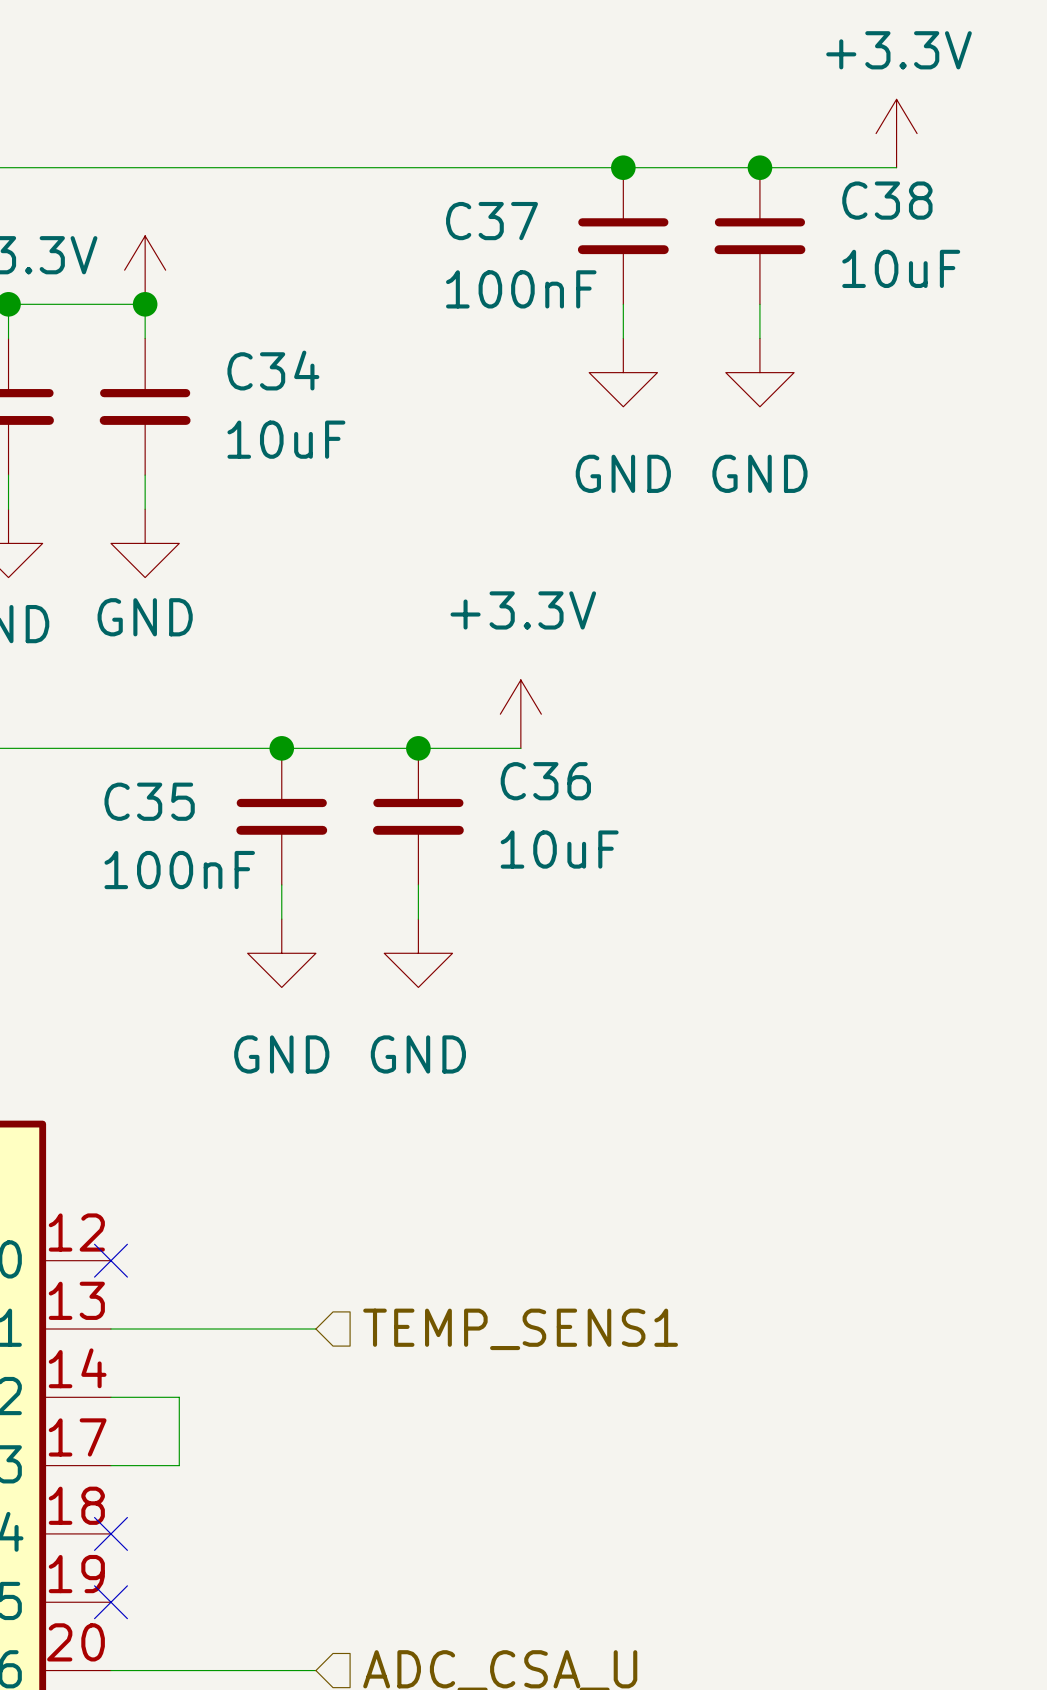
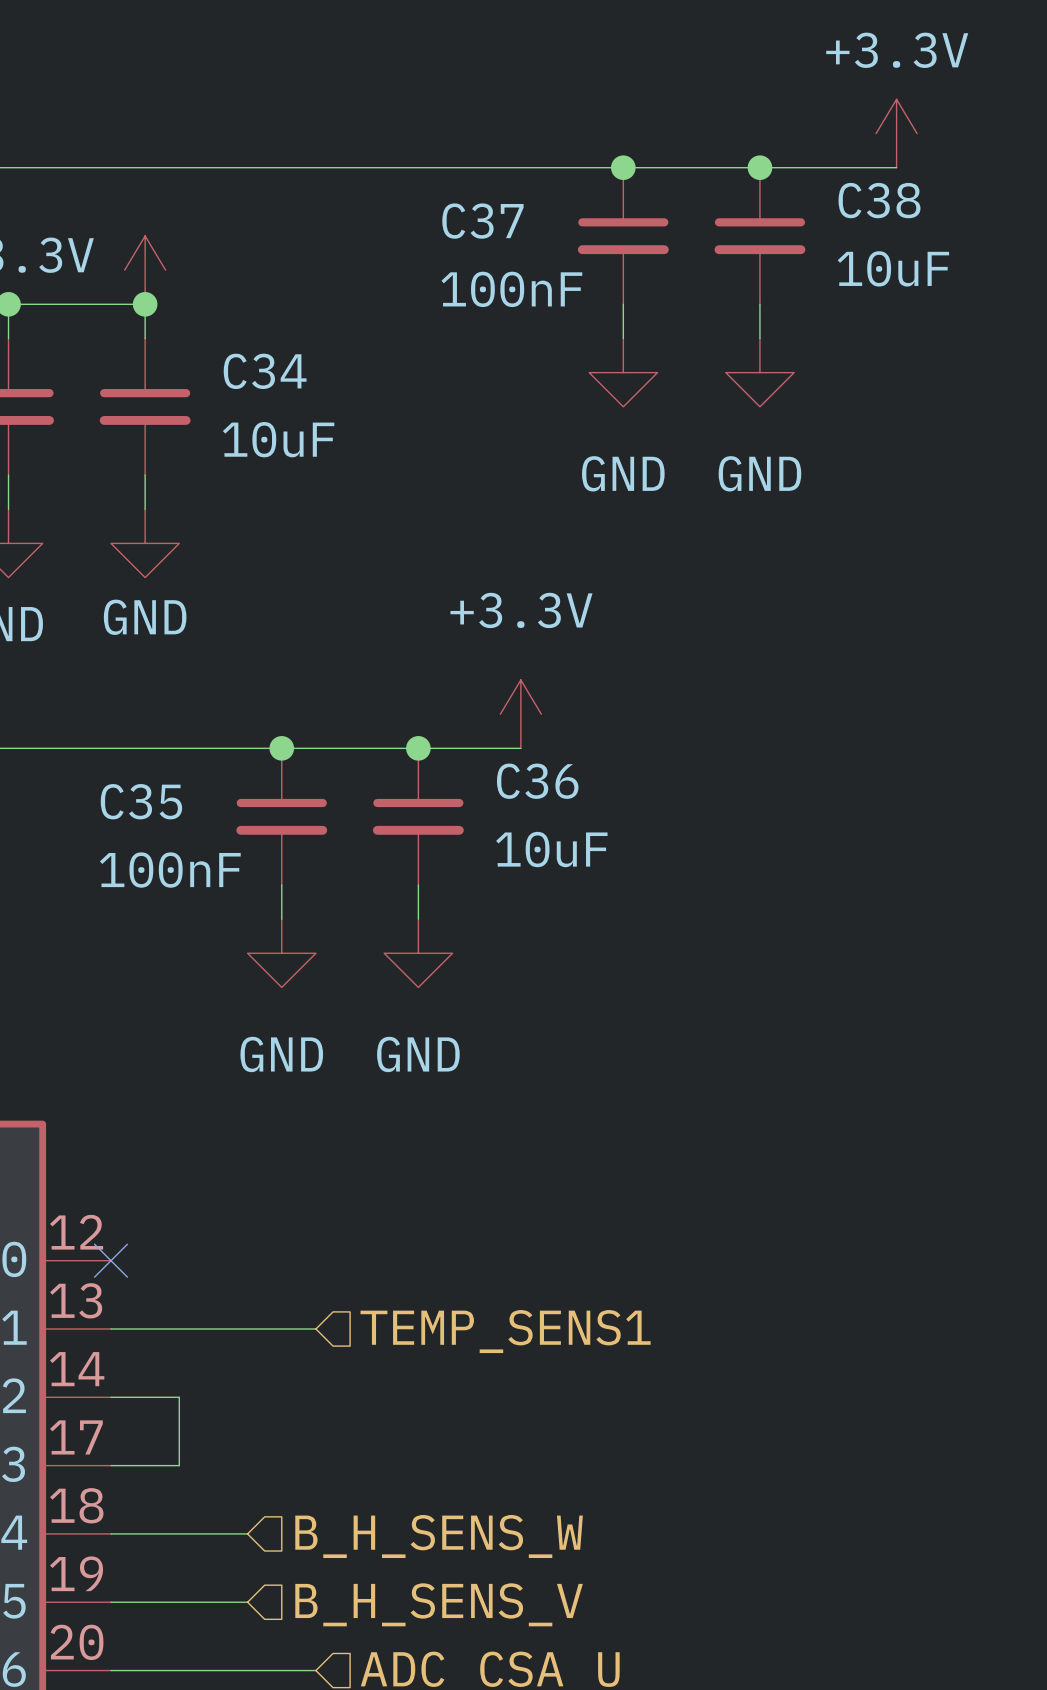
wire: none -> (110, 1533) (247, 1533)
no-connect mark: (110, 1533) -> none
hierarchical label: none -> B_H_SENS_W (439, 1536)
wire: none -> (110, 1602) (247, 1602)
no-connect mark: (110, 1602) -> none
hierarchical label: none -> B_H_SENS_V (439, 1604)

